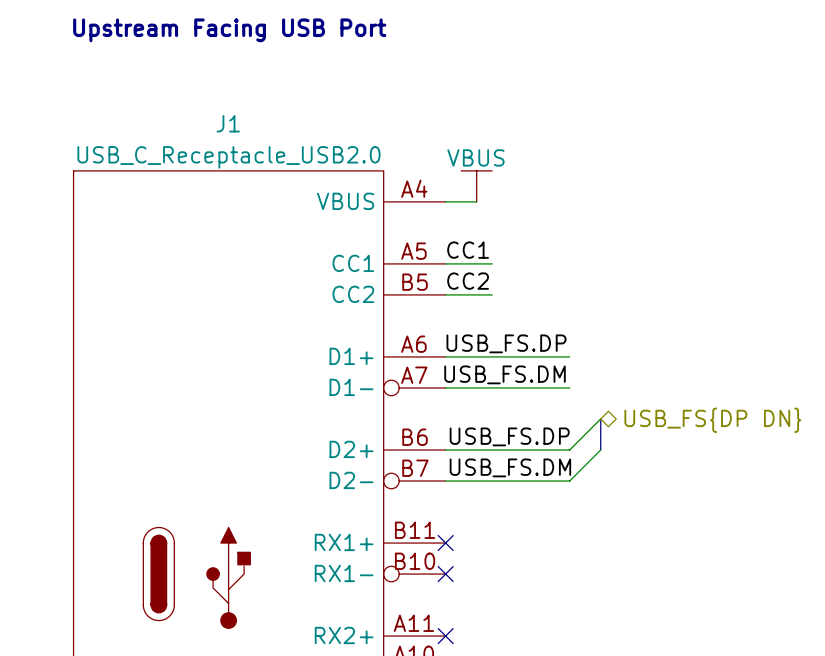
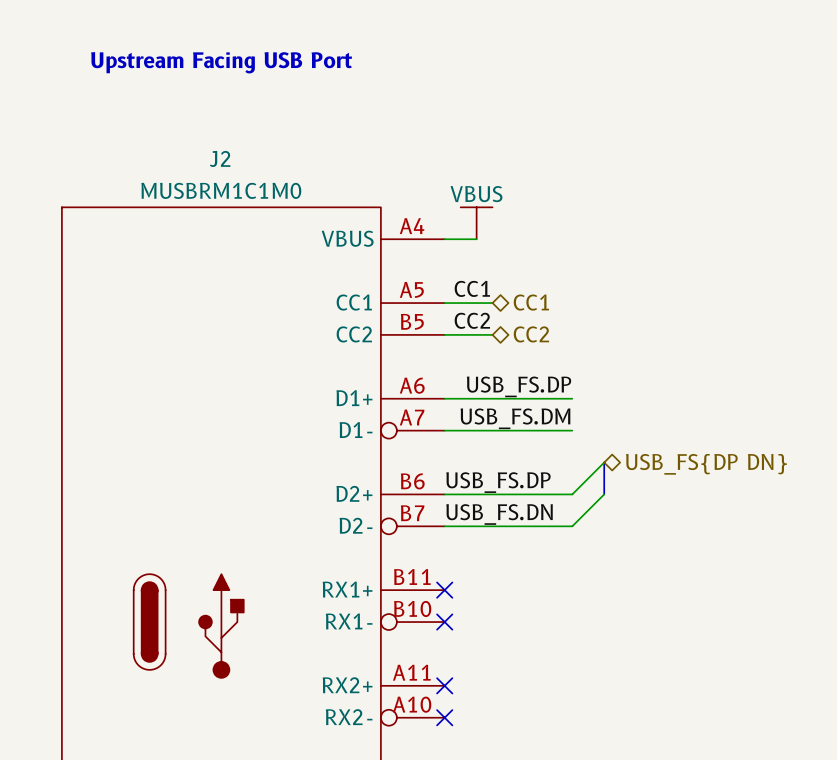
J1 name: J1 (228, 123) -> J2 (220, 158)
J1 value: USB_C_Receptacle_USB2.0 (228, 157) -> MUSBRM1C1M0 (221, 190)
hierarchical label: none -> CC1 (531, 302)
hierarchical label: none -> CC2 (531, 334)
label: USB_FS.DM (510, 467) -> USB_FS.DN (499, 514)

